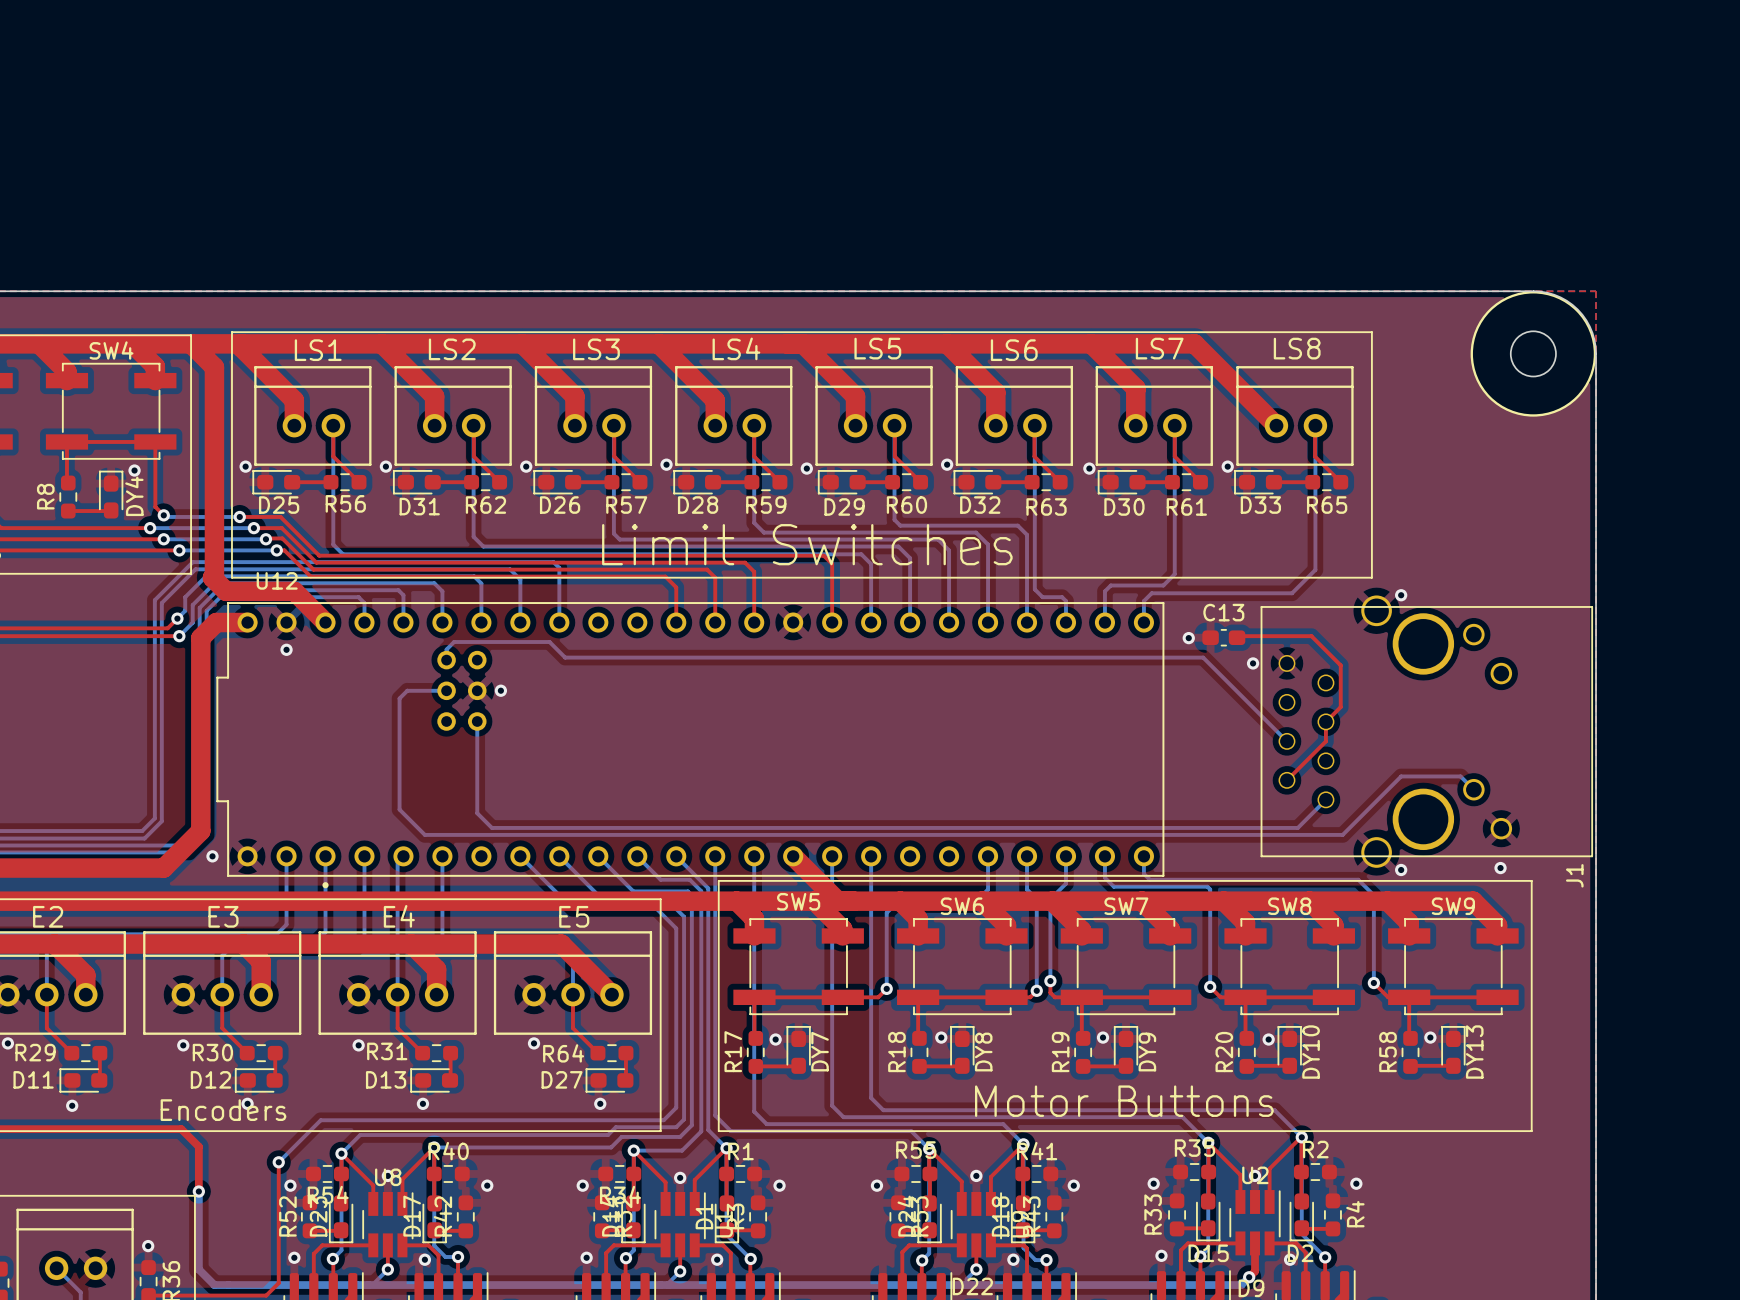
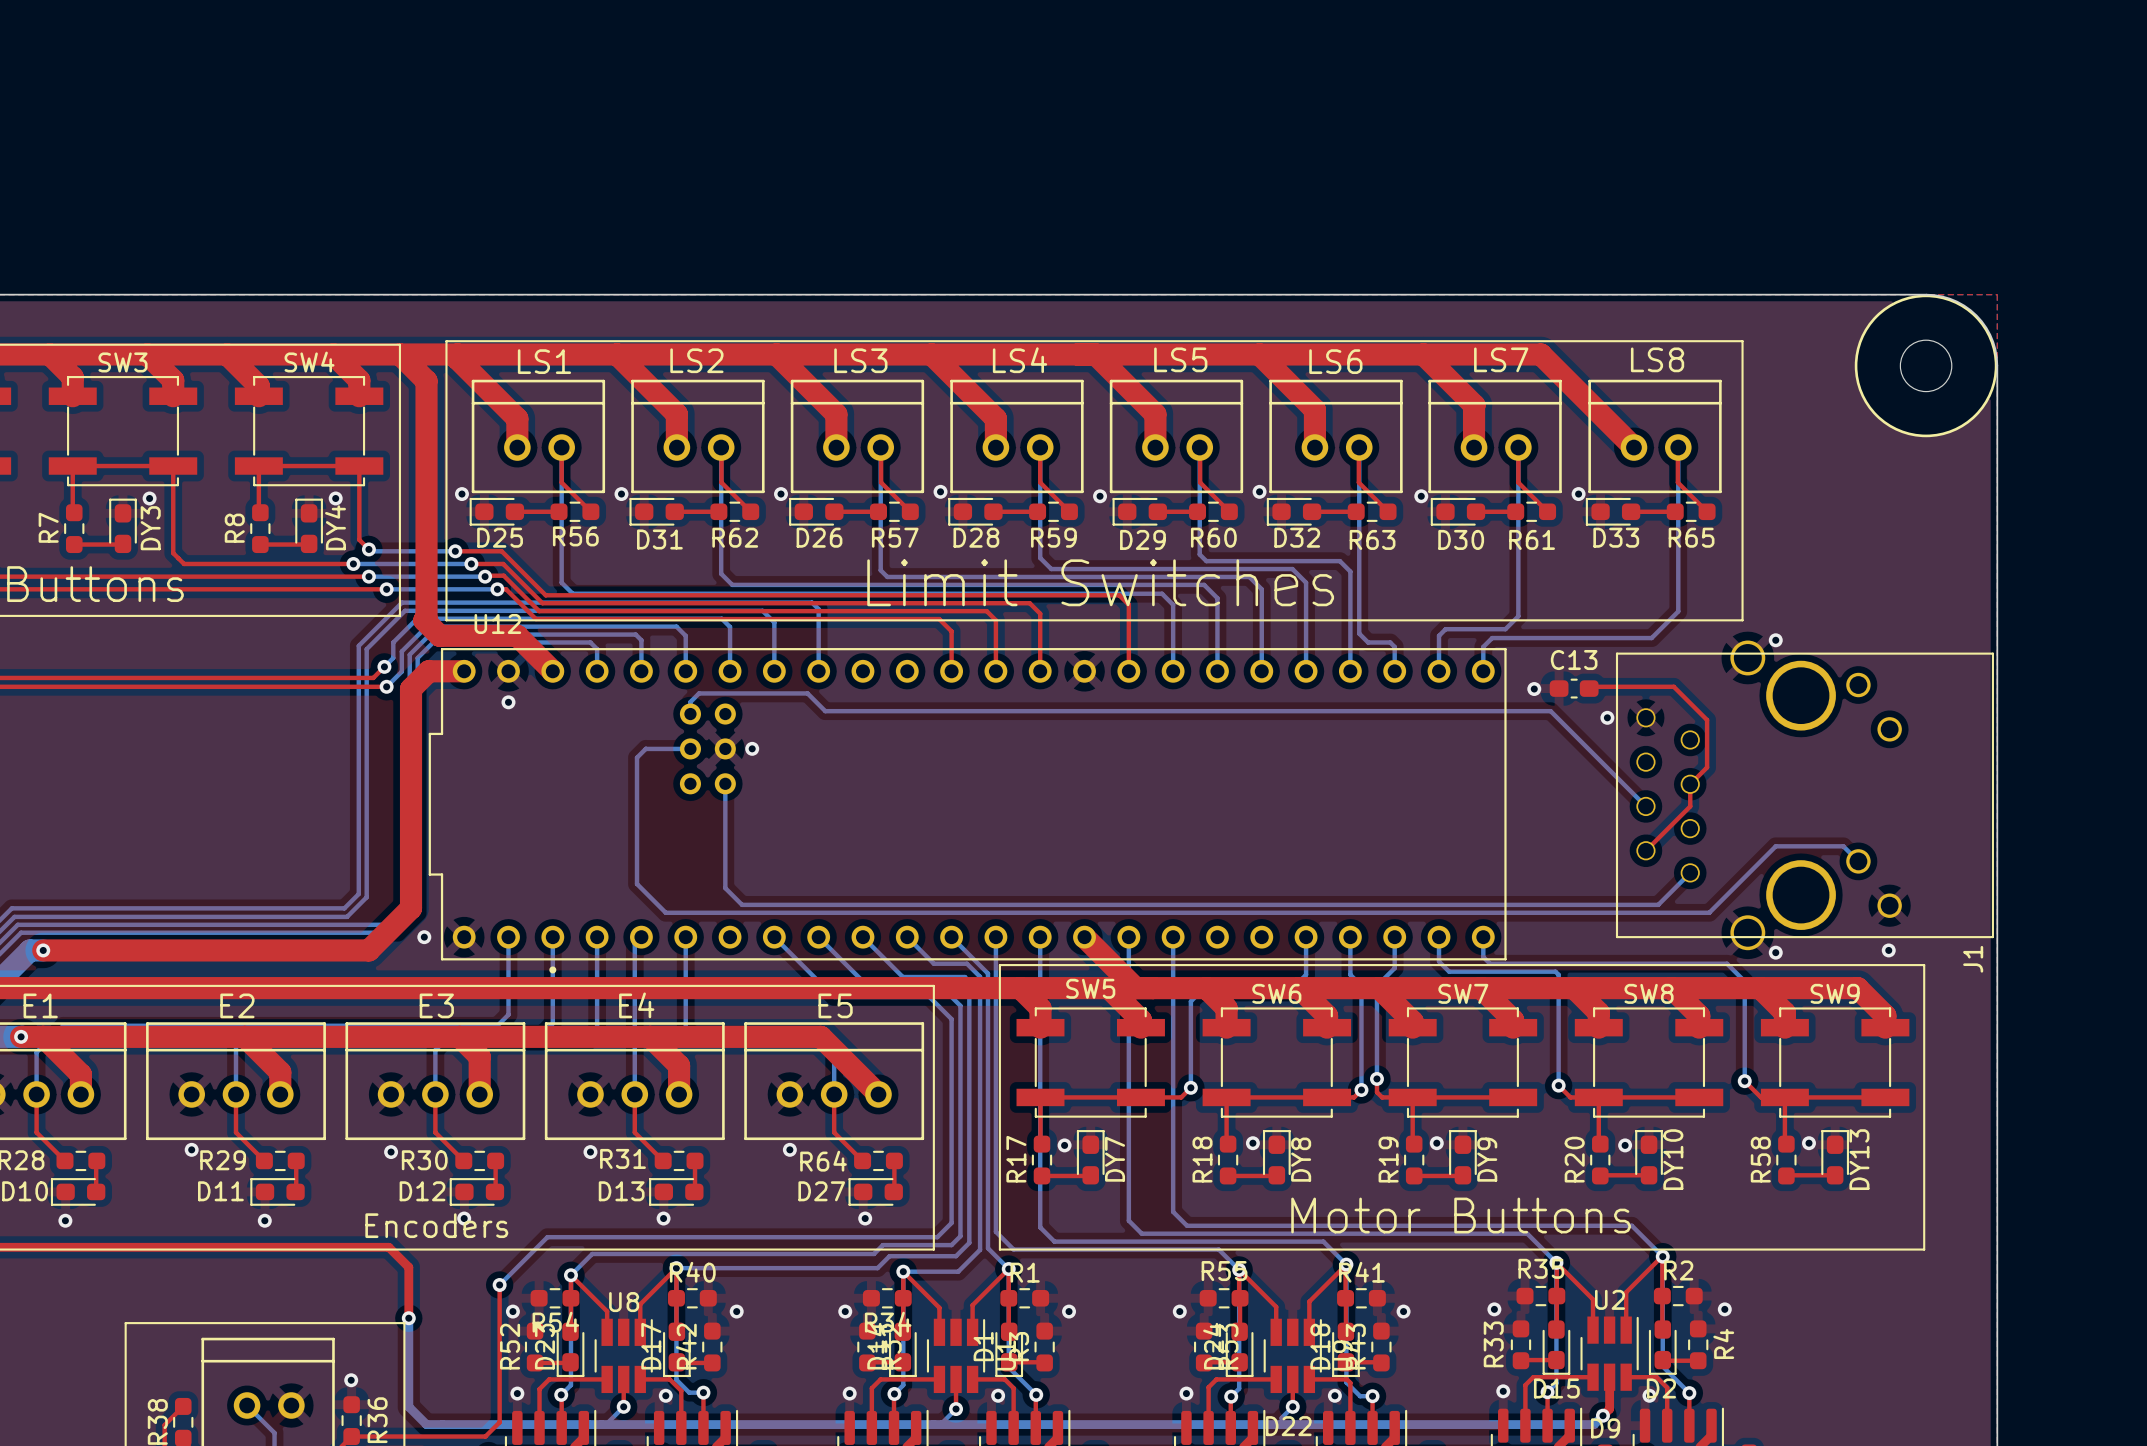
via: (387, 1175) -> none
via: (976, 1175) -> none
via: (1255, 1175) -> none
via: (680, 1177) -> none
via: none -> (1186, 1393)

